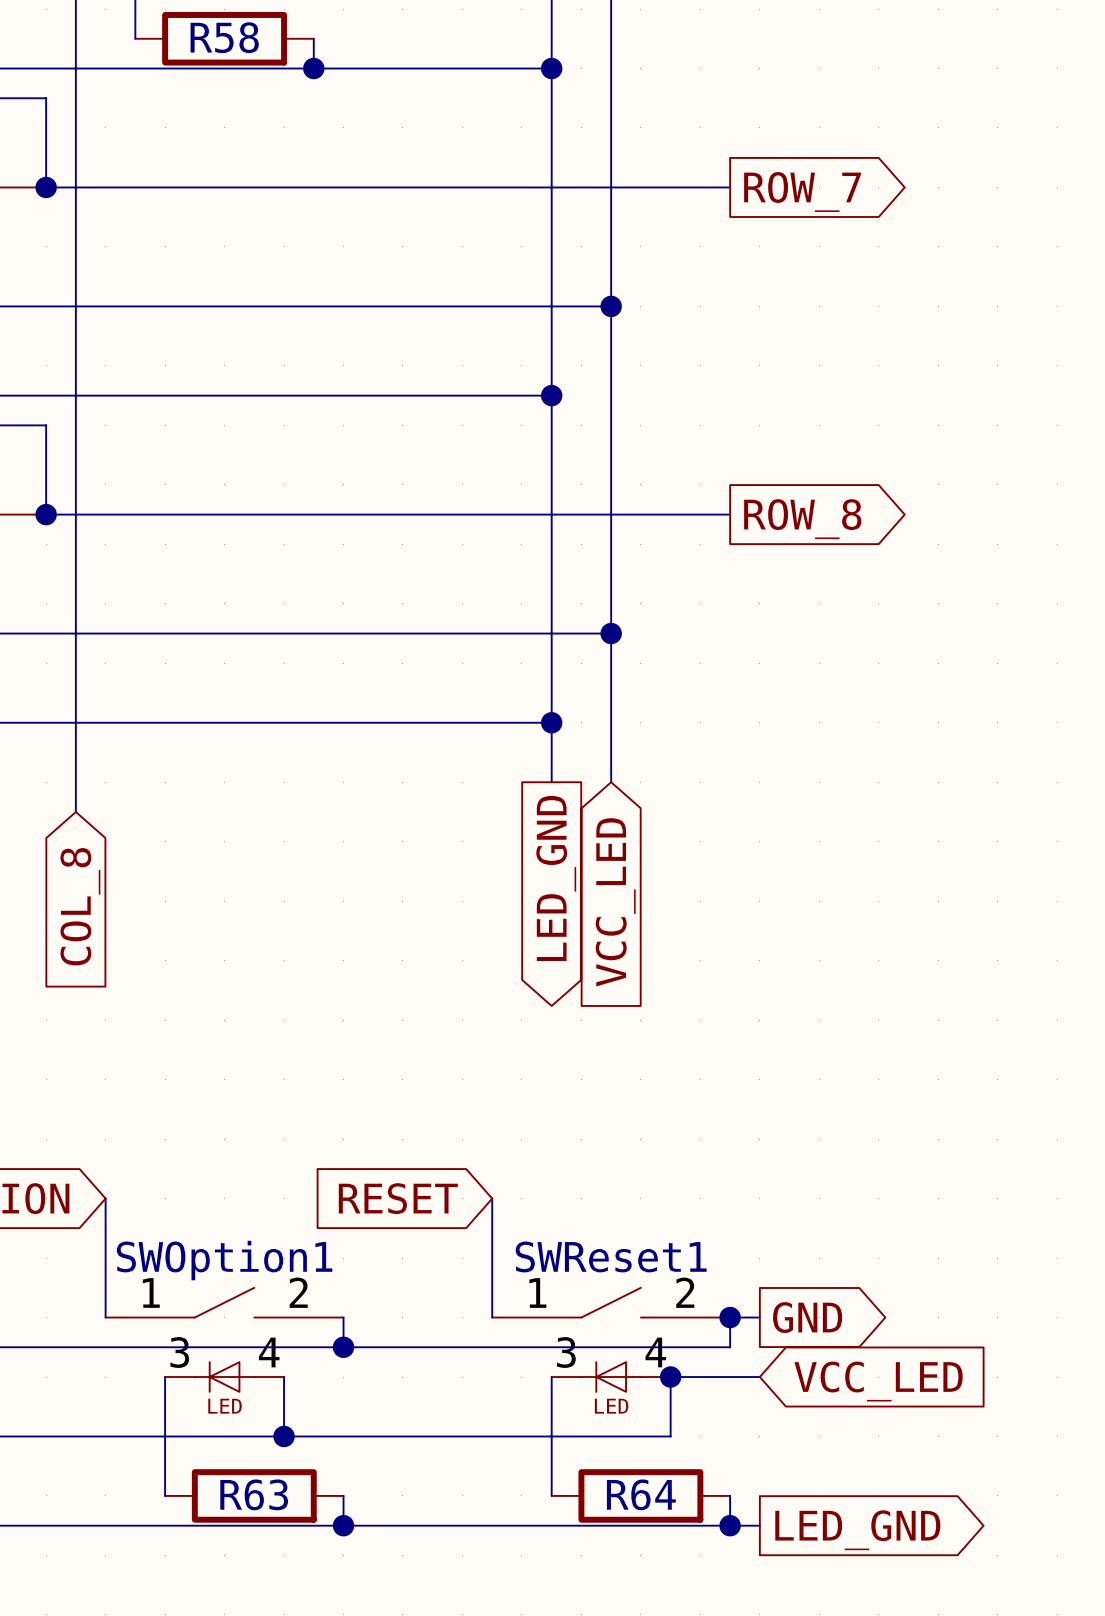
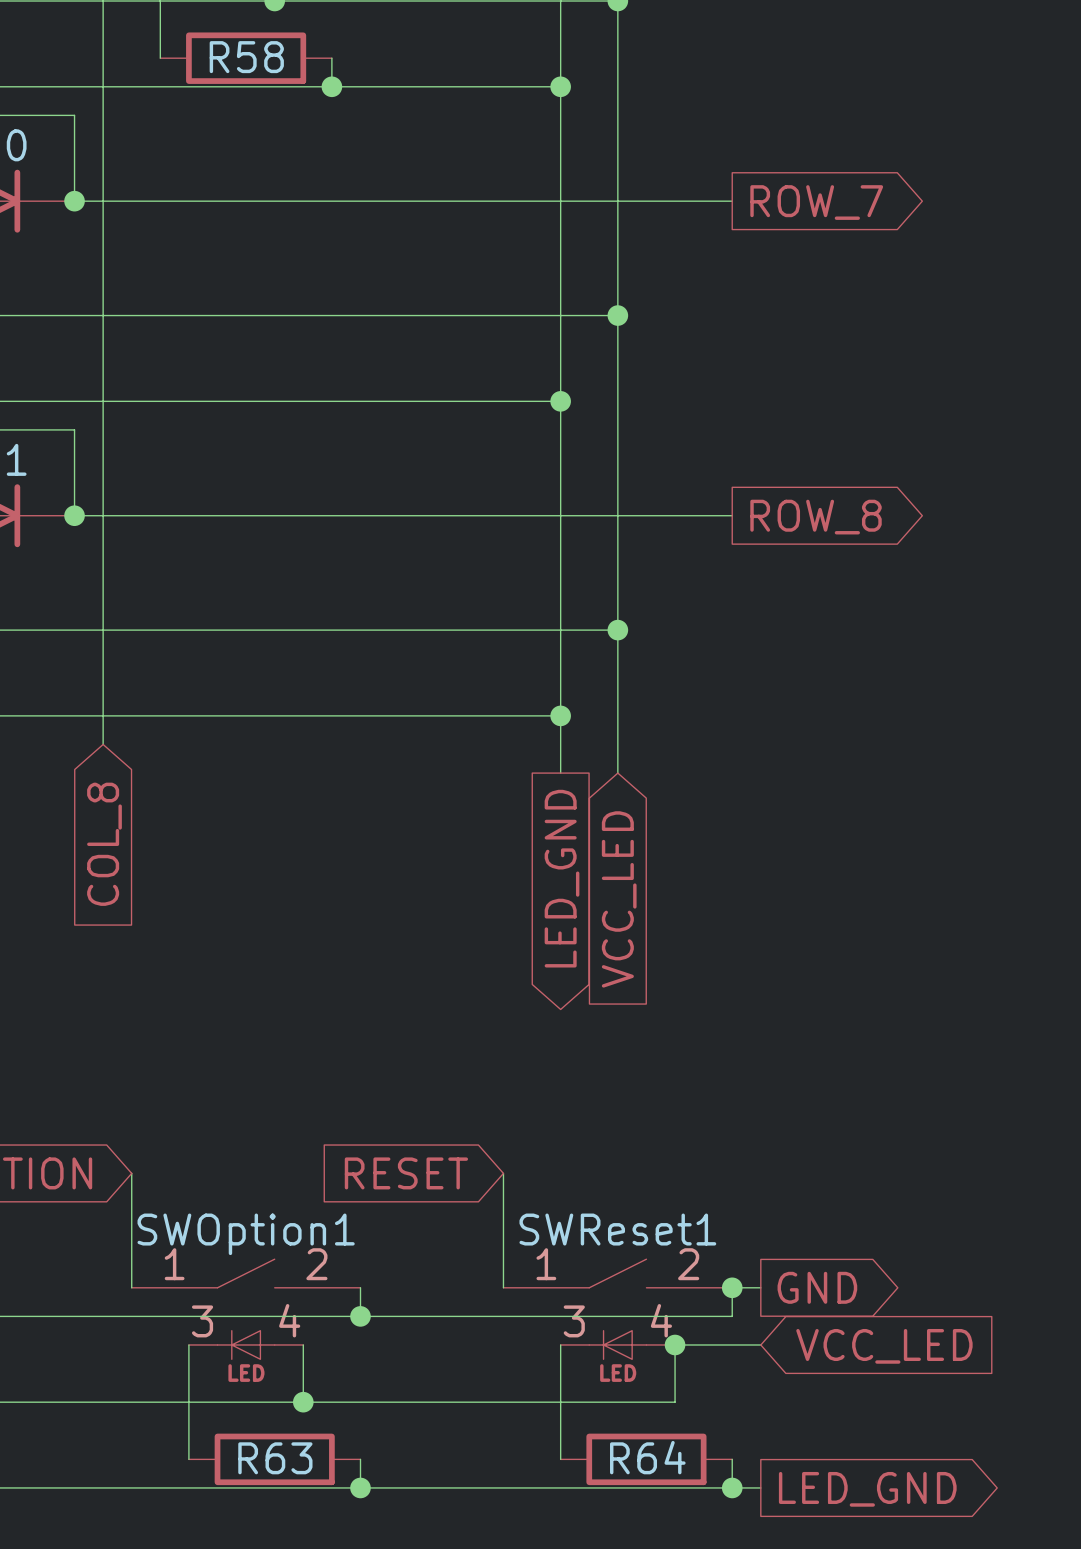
wire: (75, 752) (75, 811) -> none
global label position: COL_8 (80, 906) -> COL_8 (104, 844)

